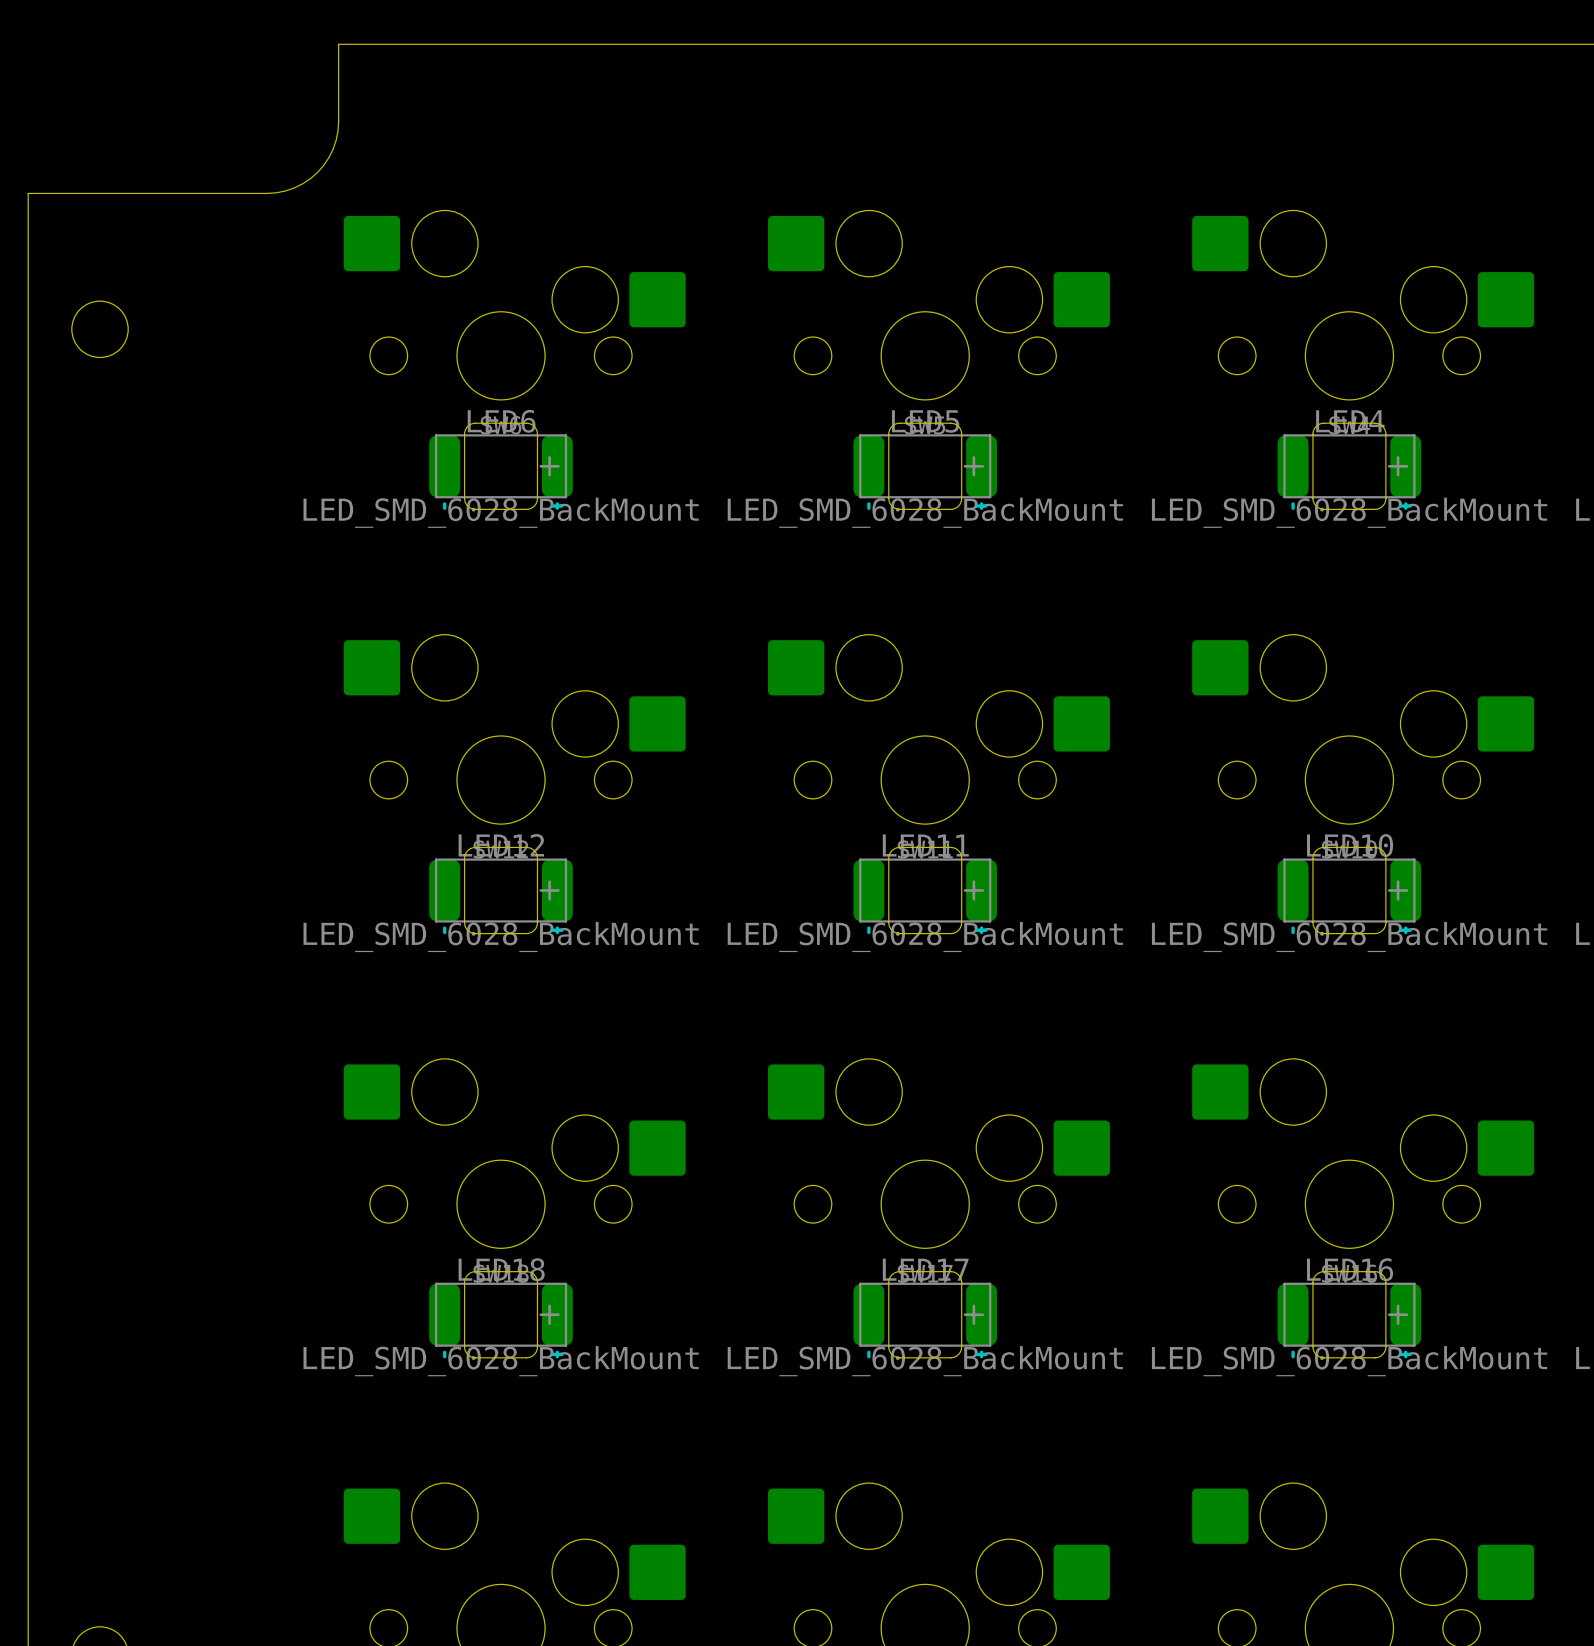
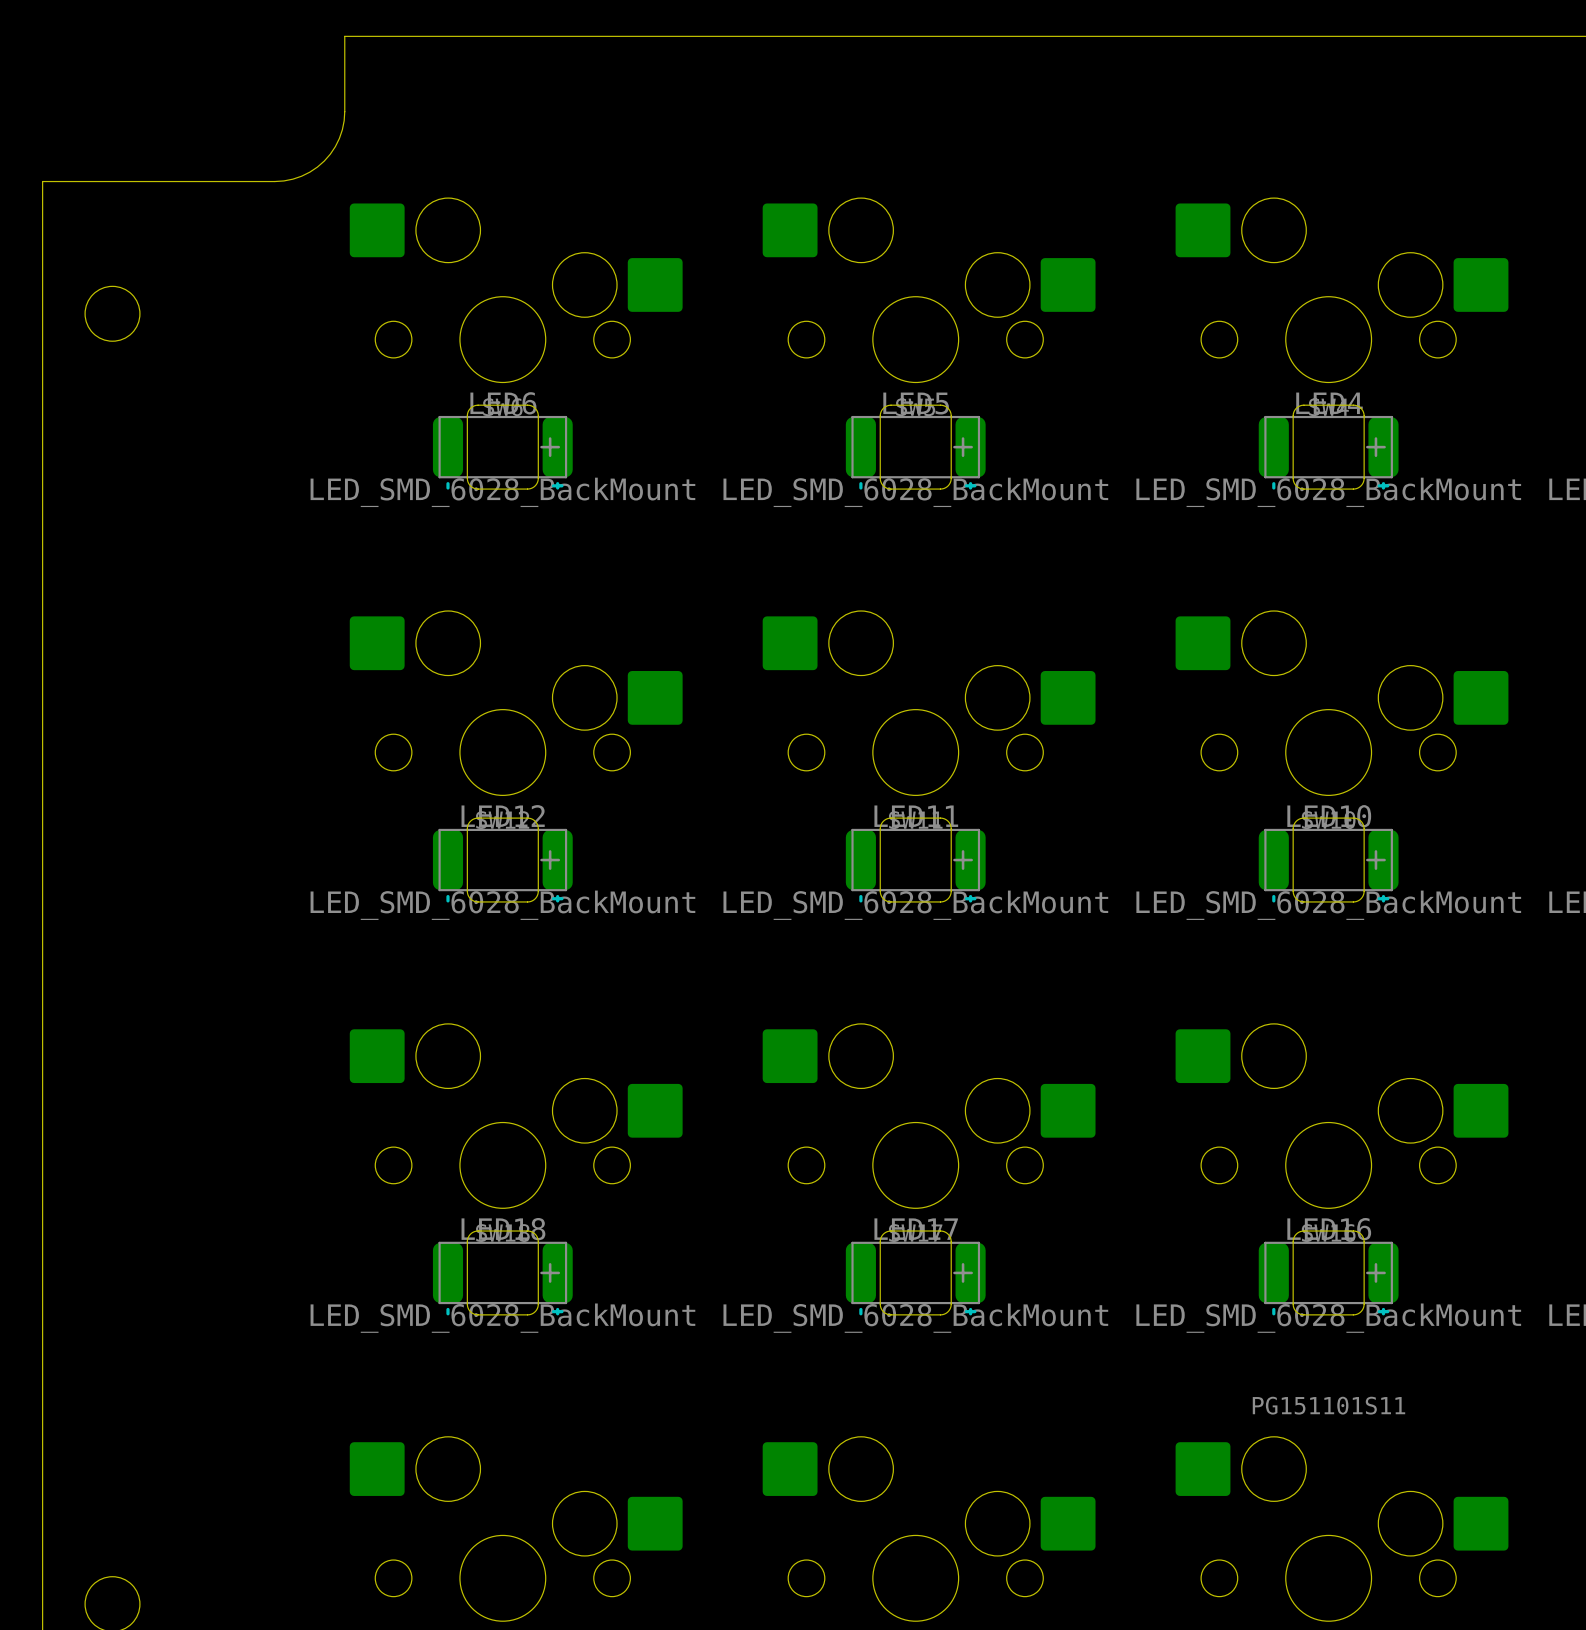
part value: none -> PG151101S11 (1328, 1405)

